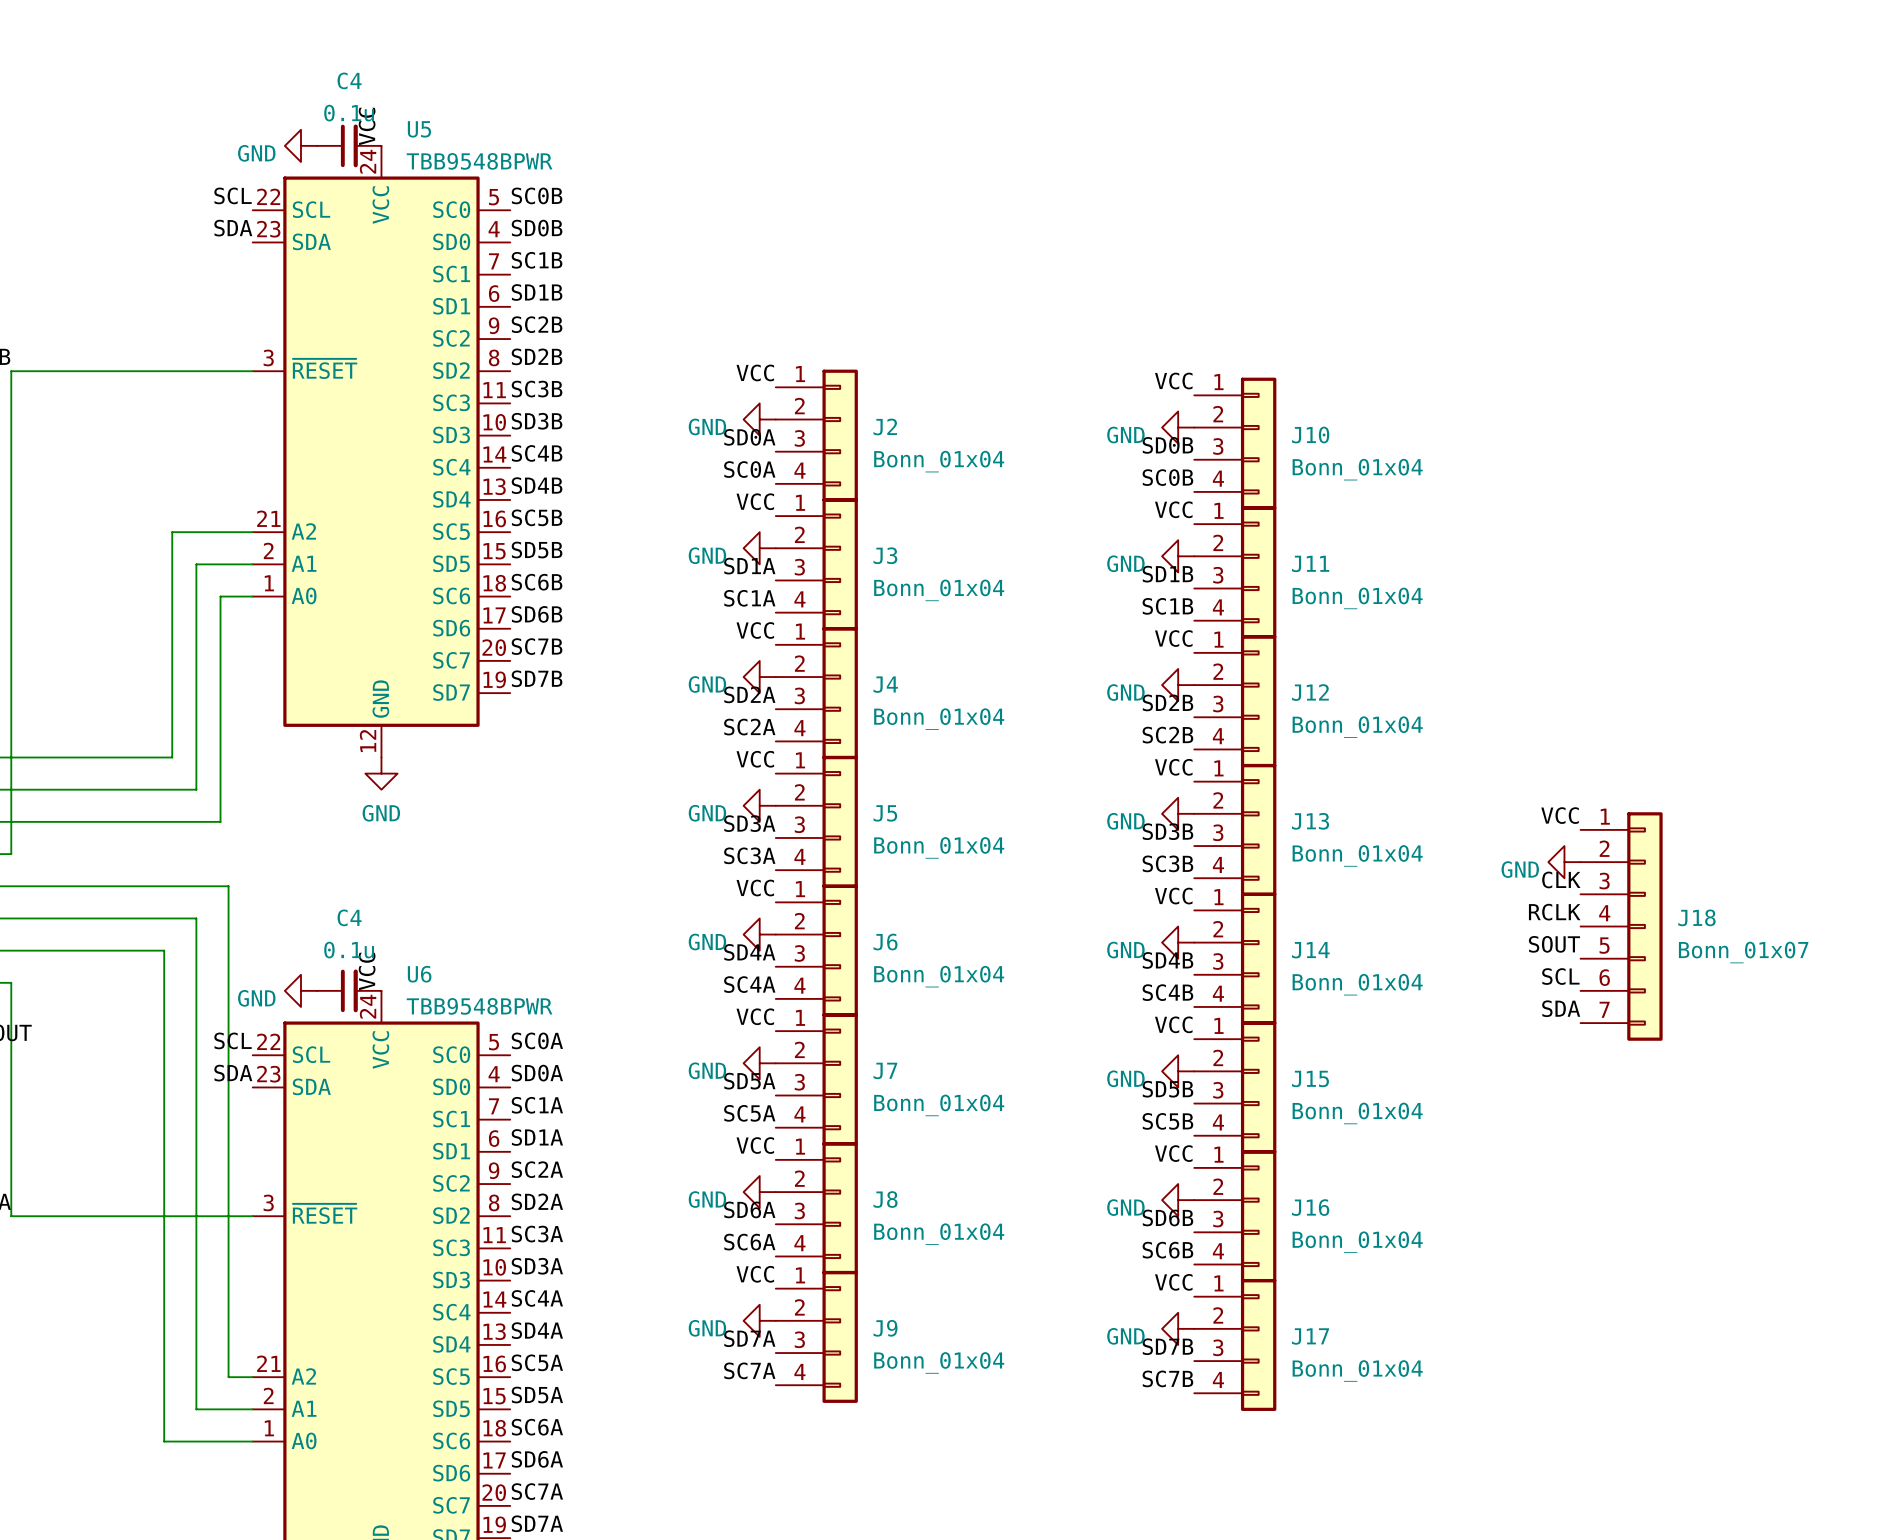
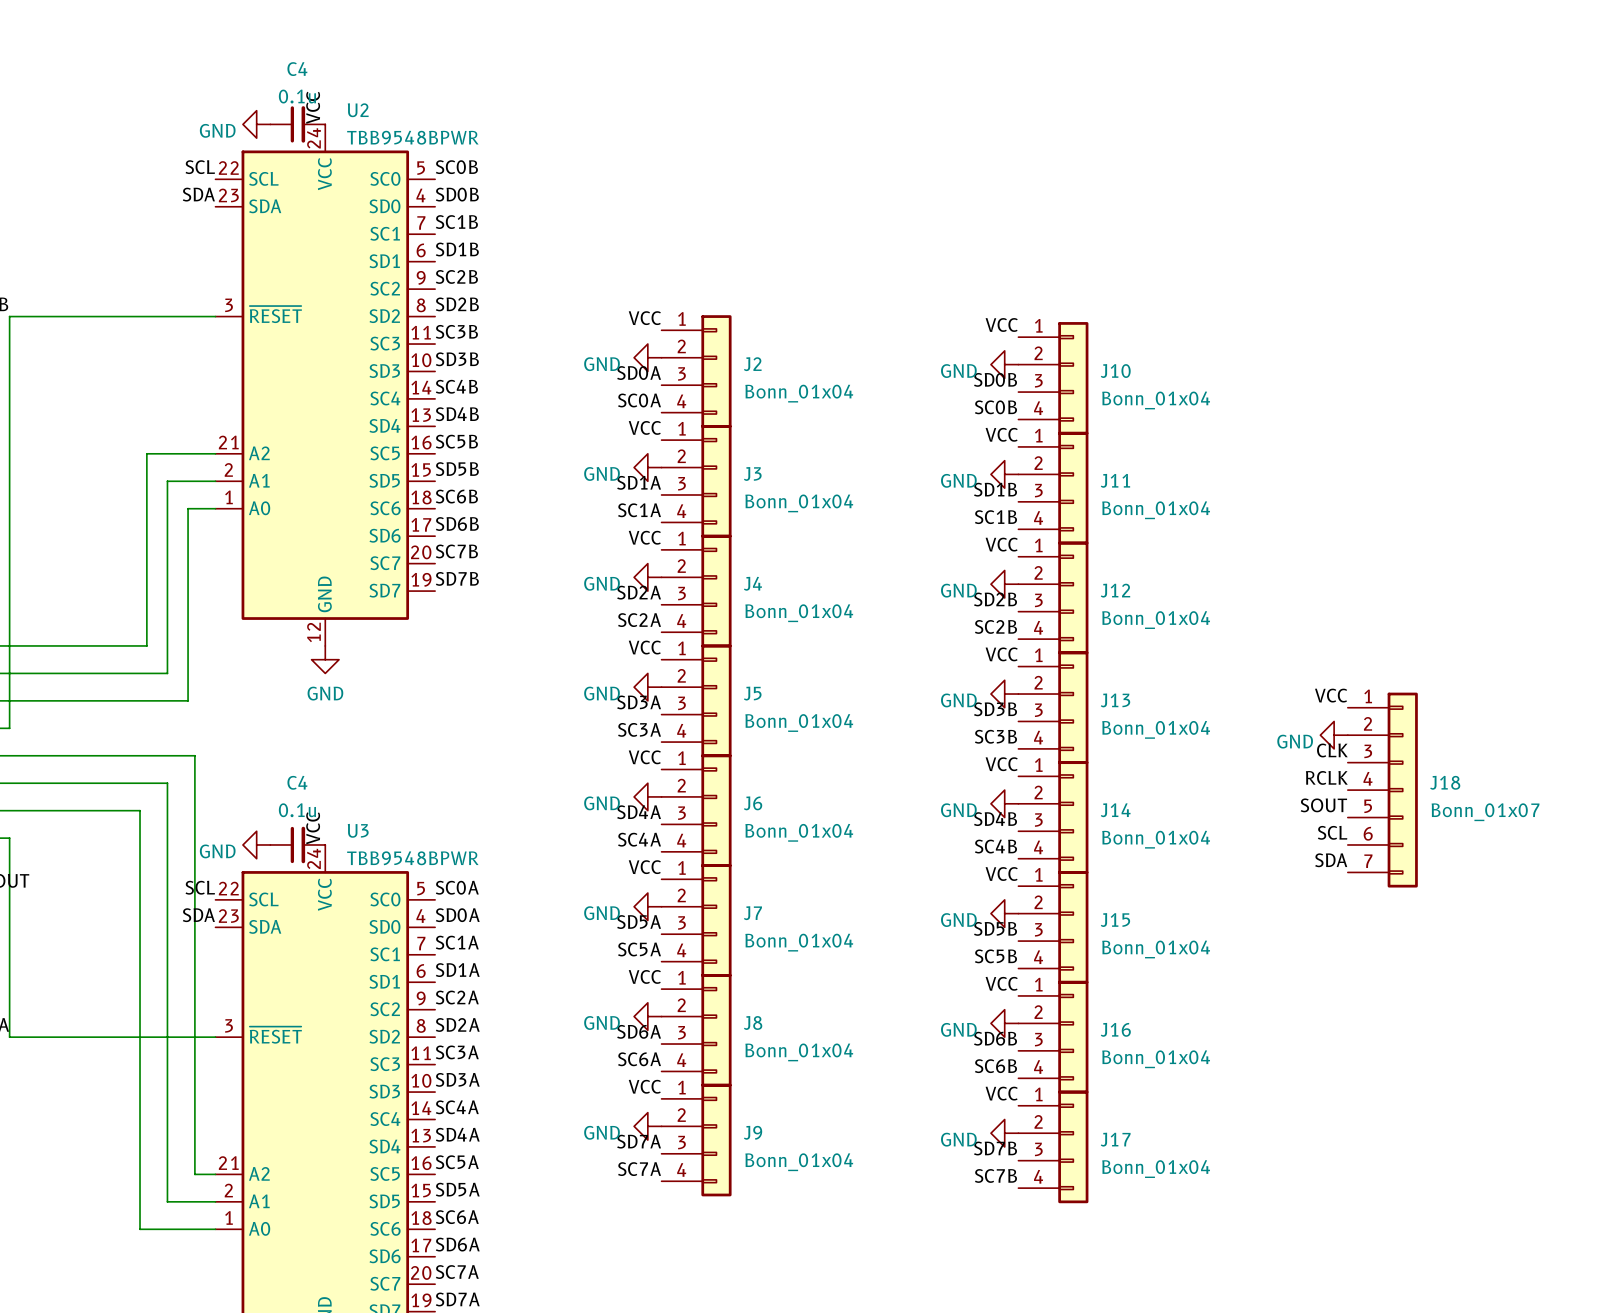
U5 name: U5 (419, 129) -> U2 (358, 110)
U6 name: U6 (419, 974) -> U3 (358, 830)

